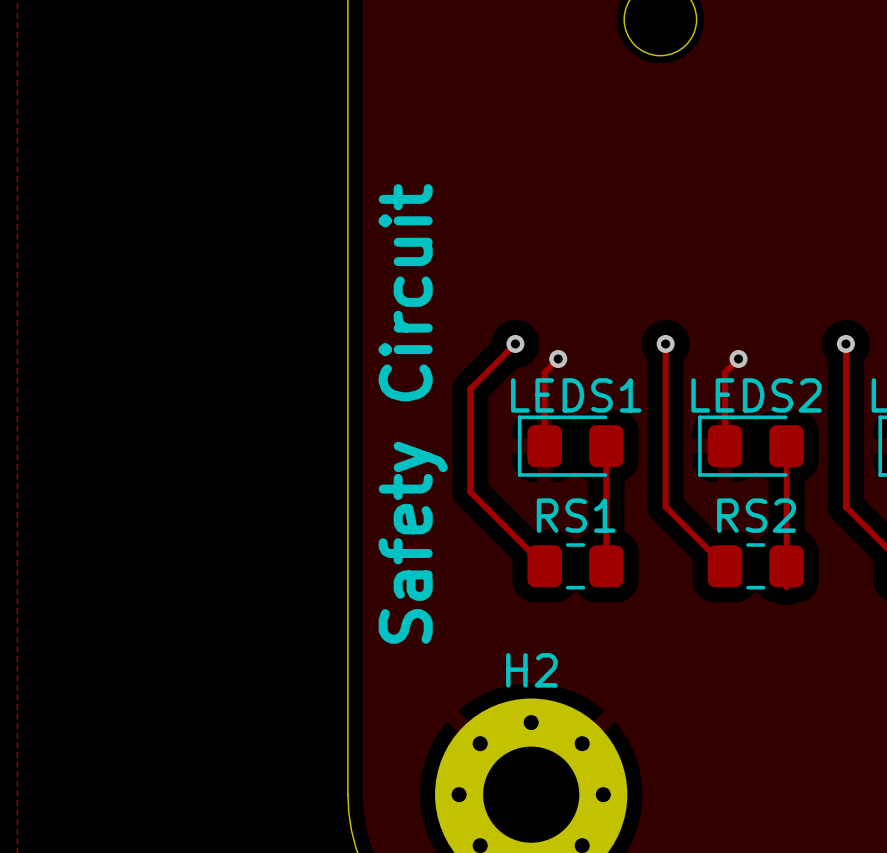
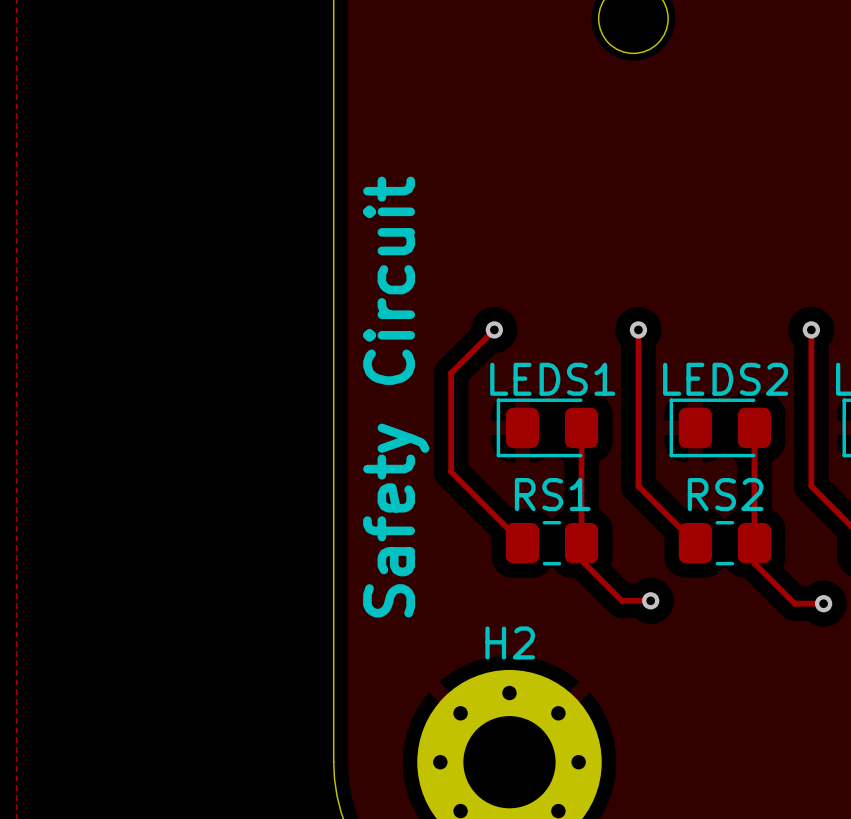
track: (558, 358) (544, 372) (544, 446) -> none
via: (558, 358) -> none
track: (738, 358) (724, 372) (724, 446) -> none
via: (738, 358) -> none
track: none -> (581, 560) (621, 600) (650, 600)
track: none -> (754, 563) (794, 603) (823, 603)
via: none -> (650, 600)
via: none -> (823, 603)

